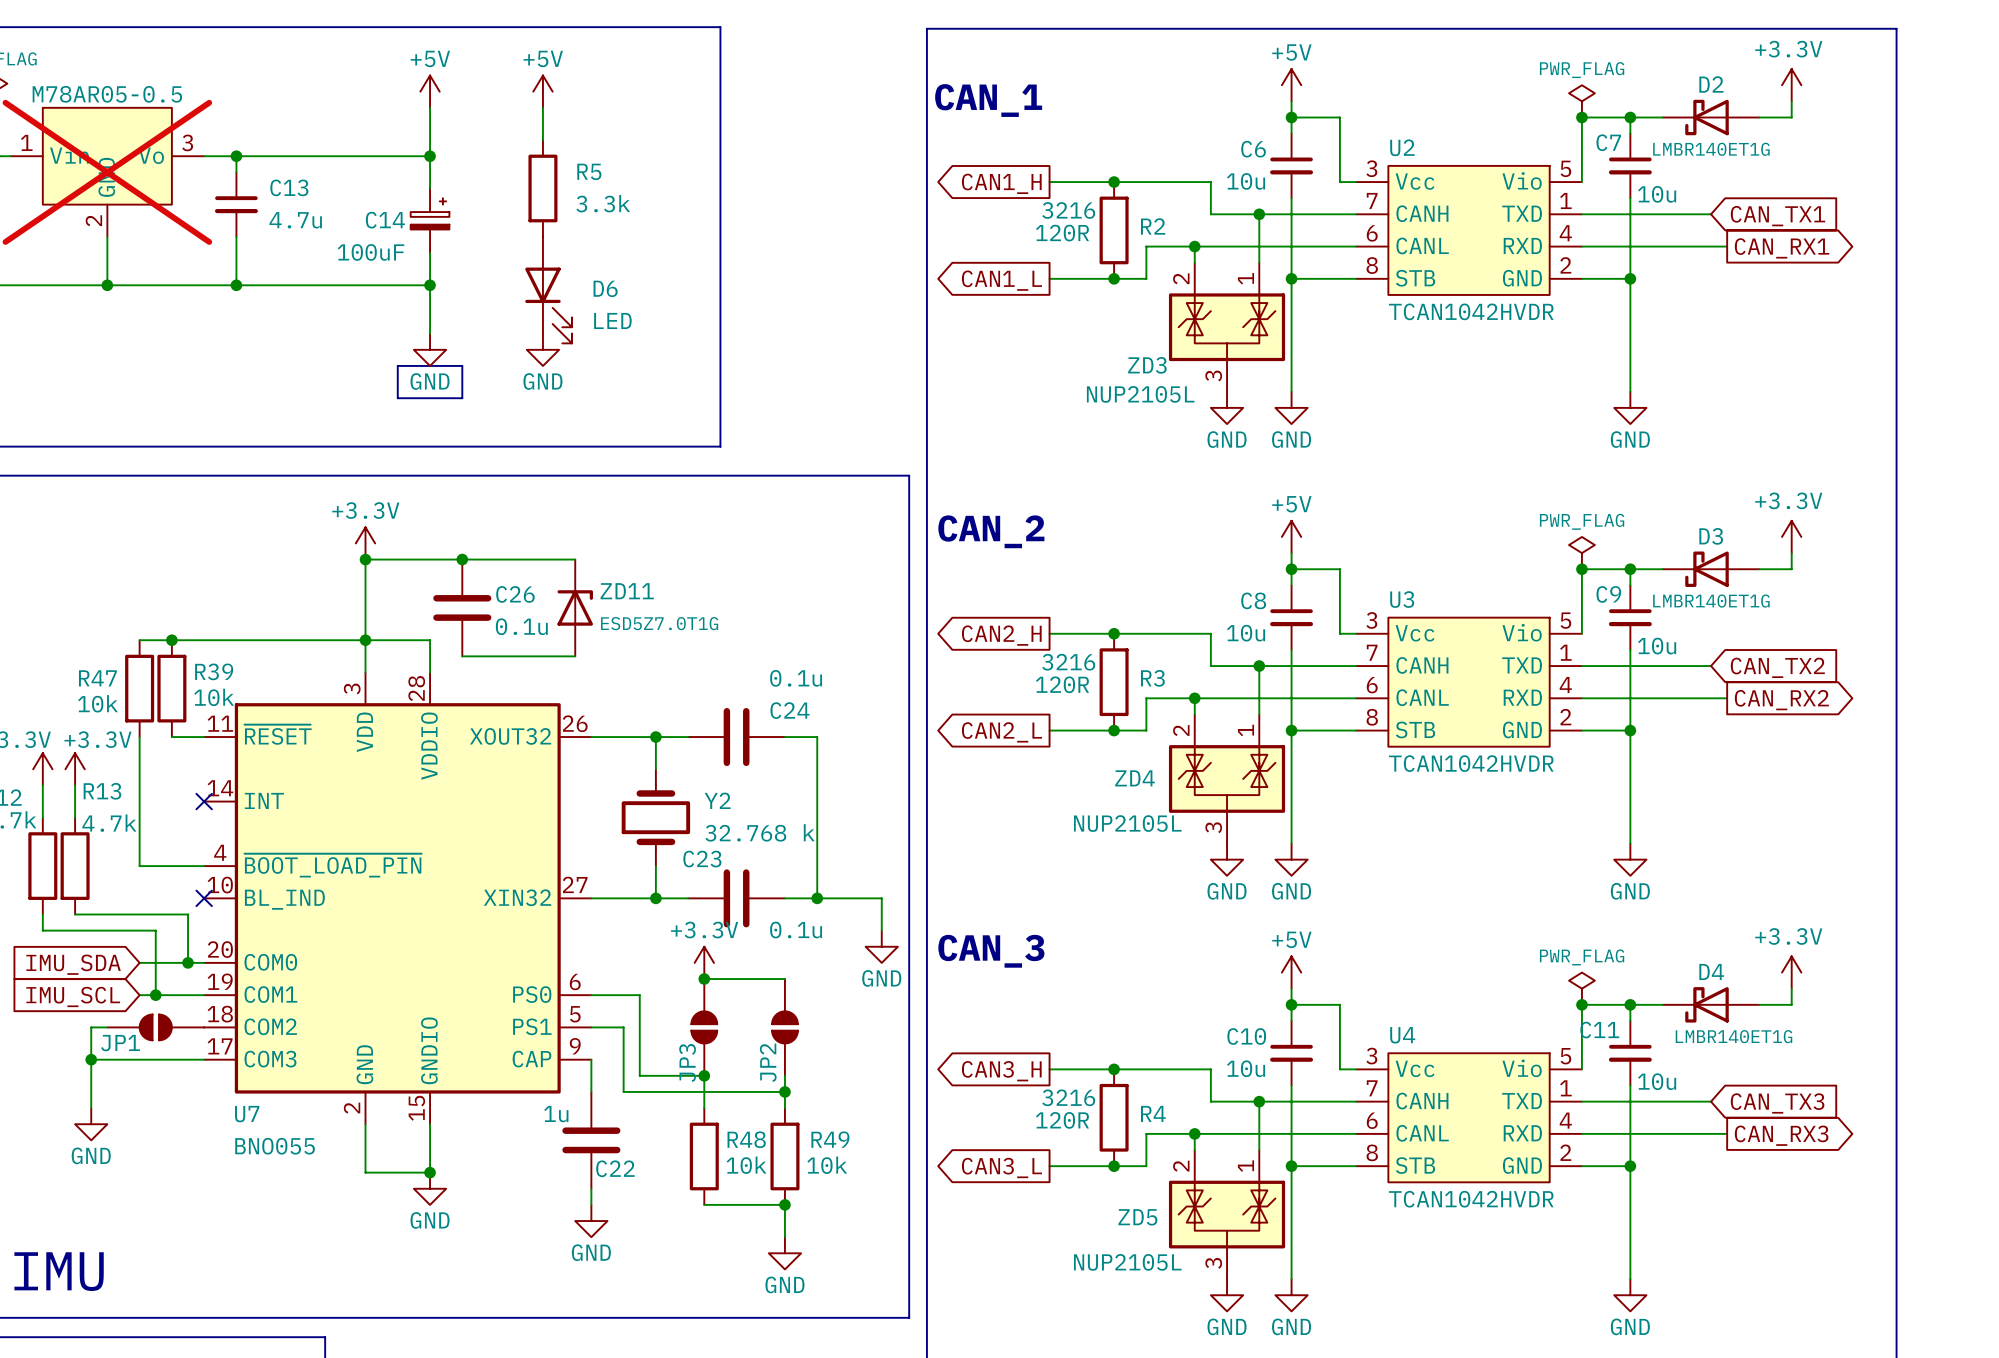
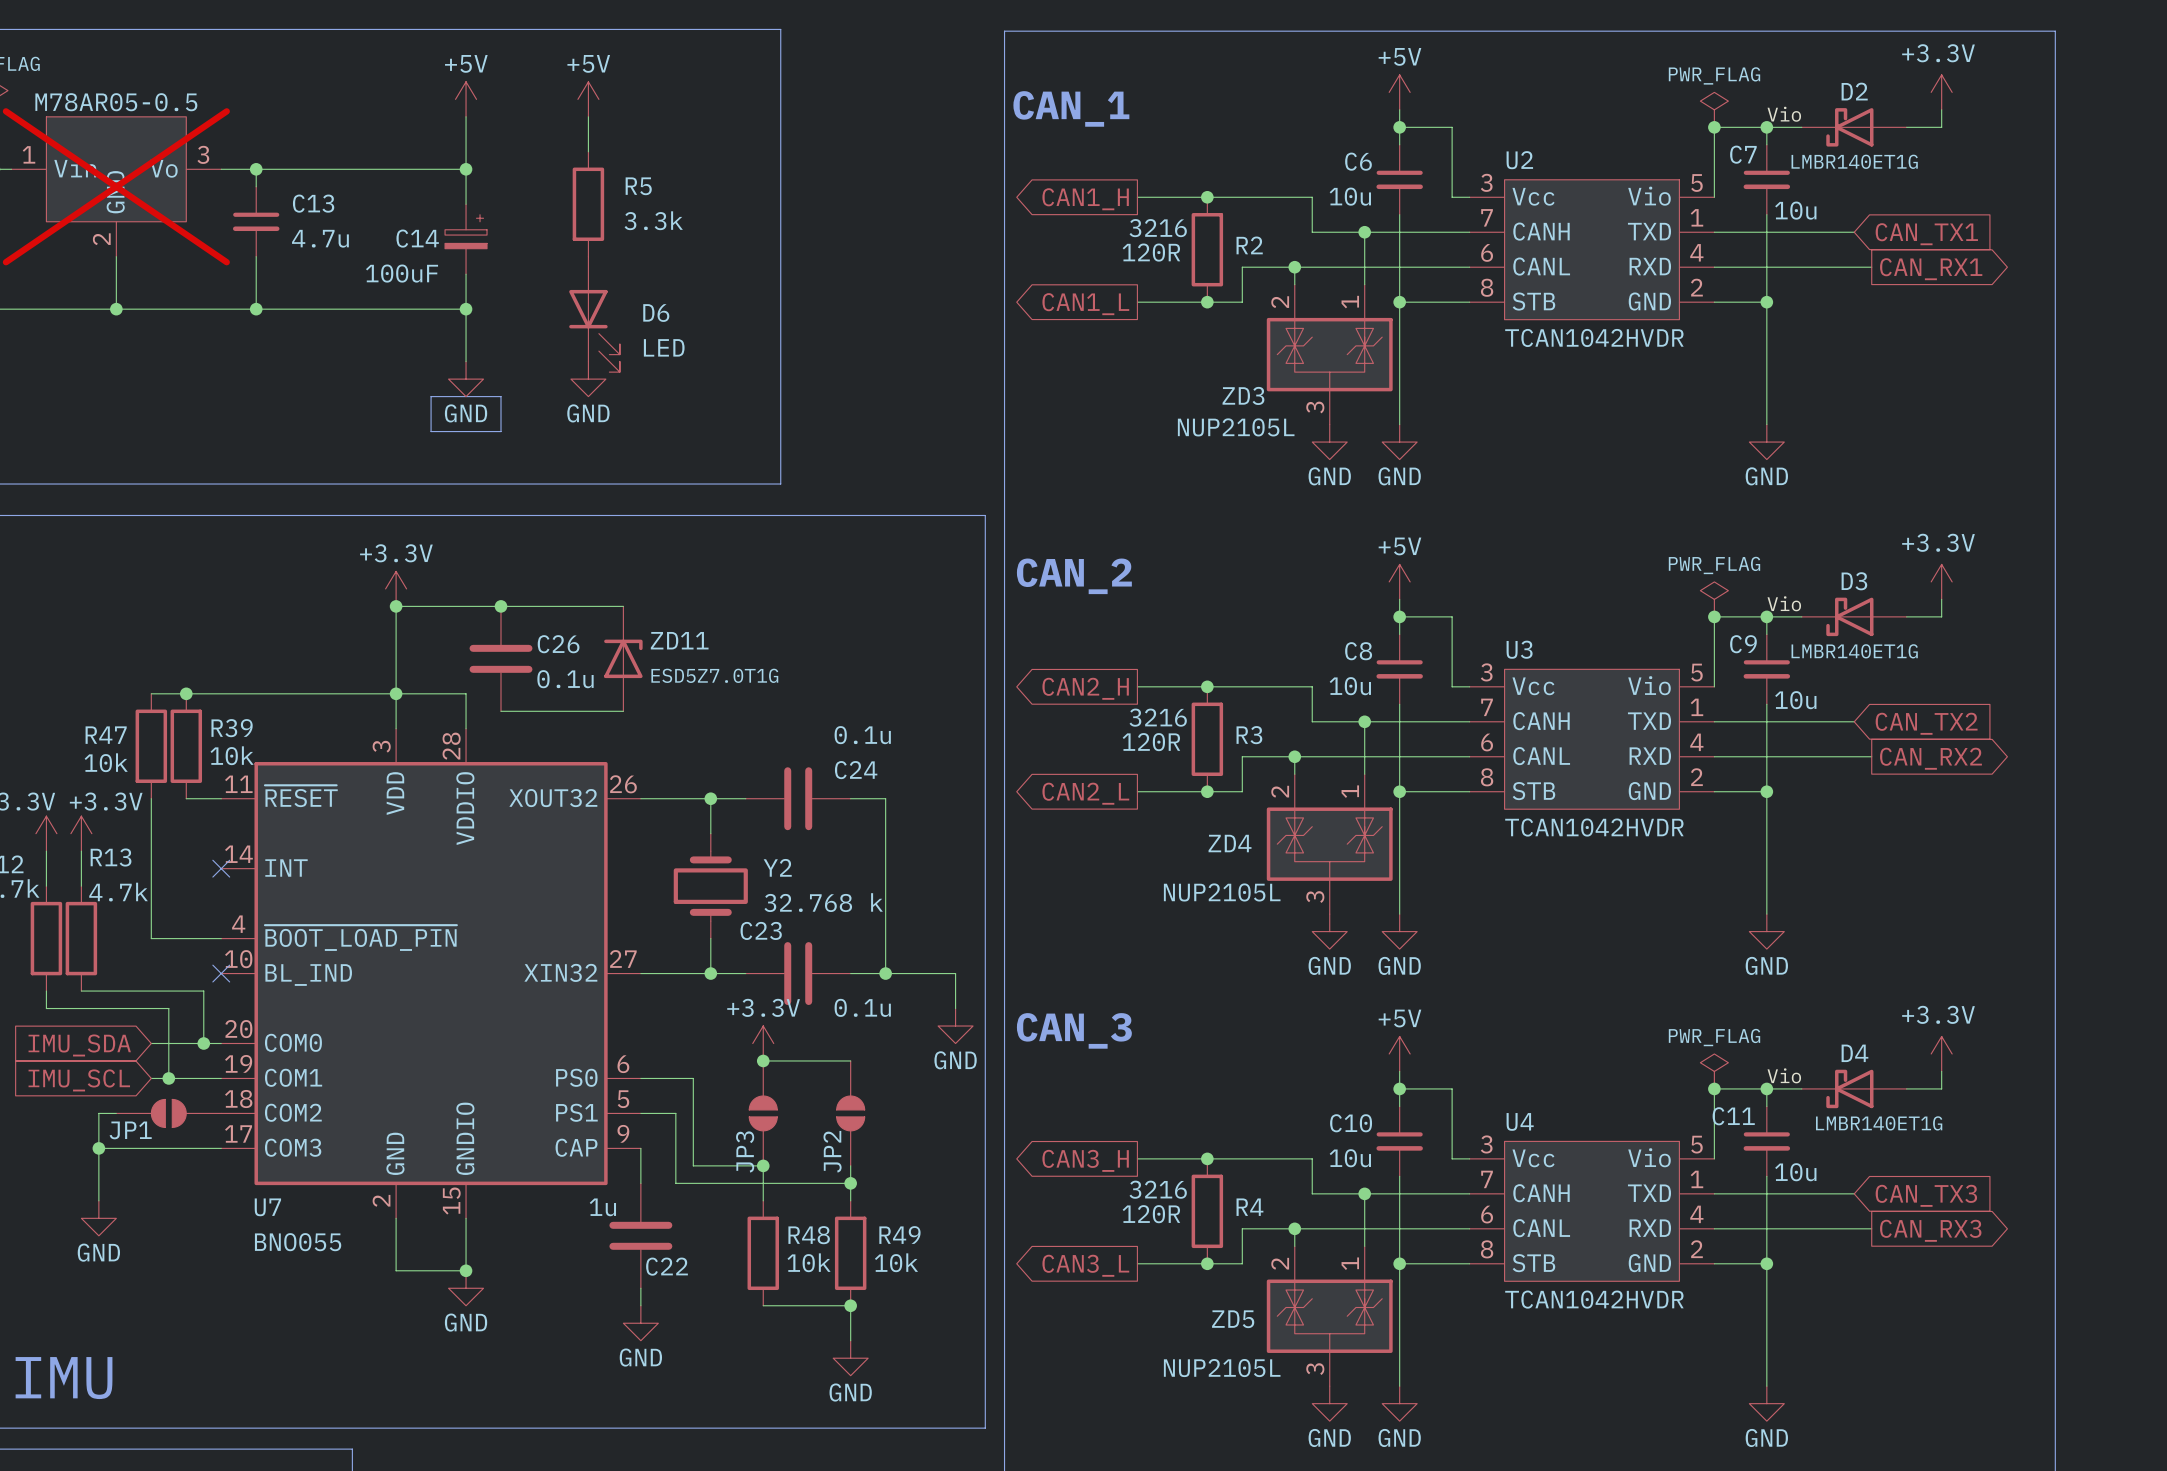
label: none -> Vio (1784, 114)
label: none -> Vio (1784, 603)
label: none -> Vio (1784, 1075)

